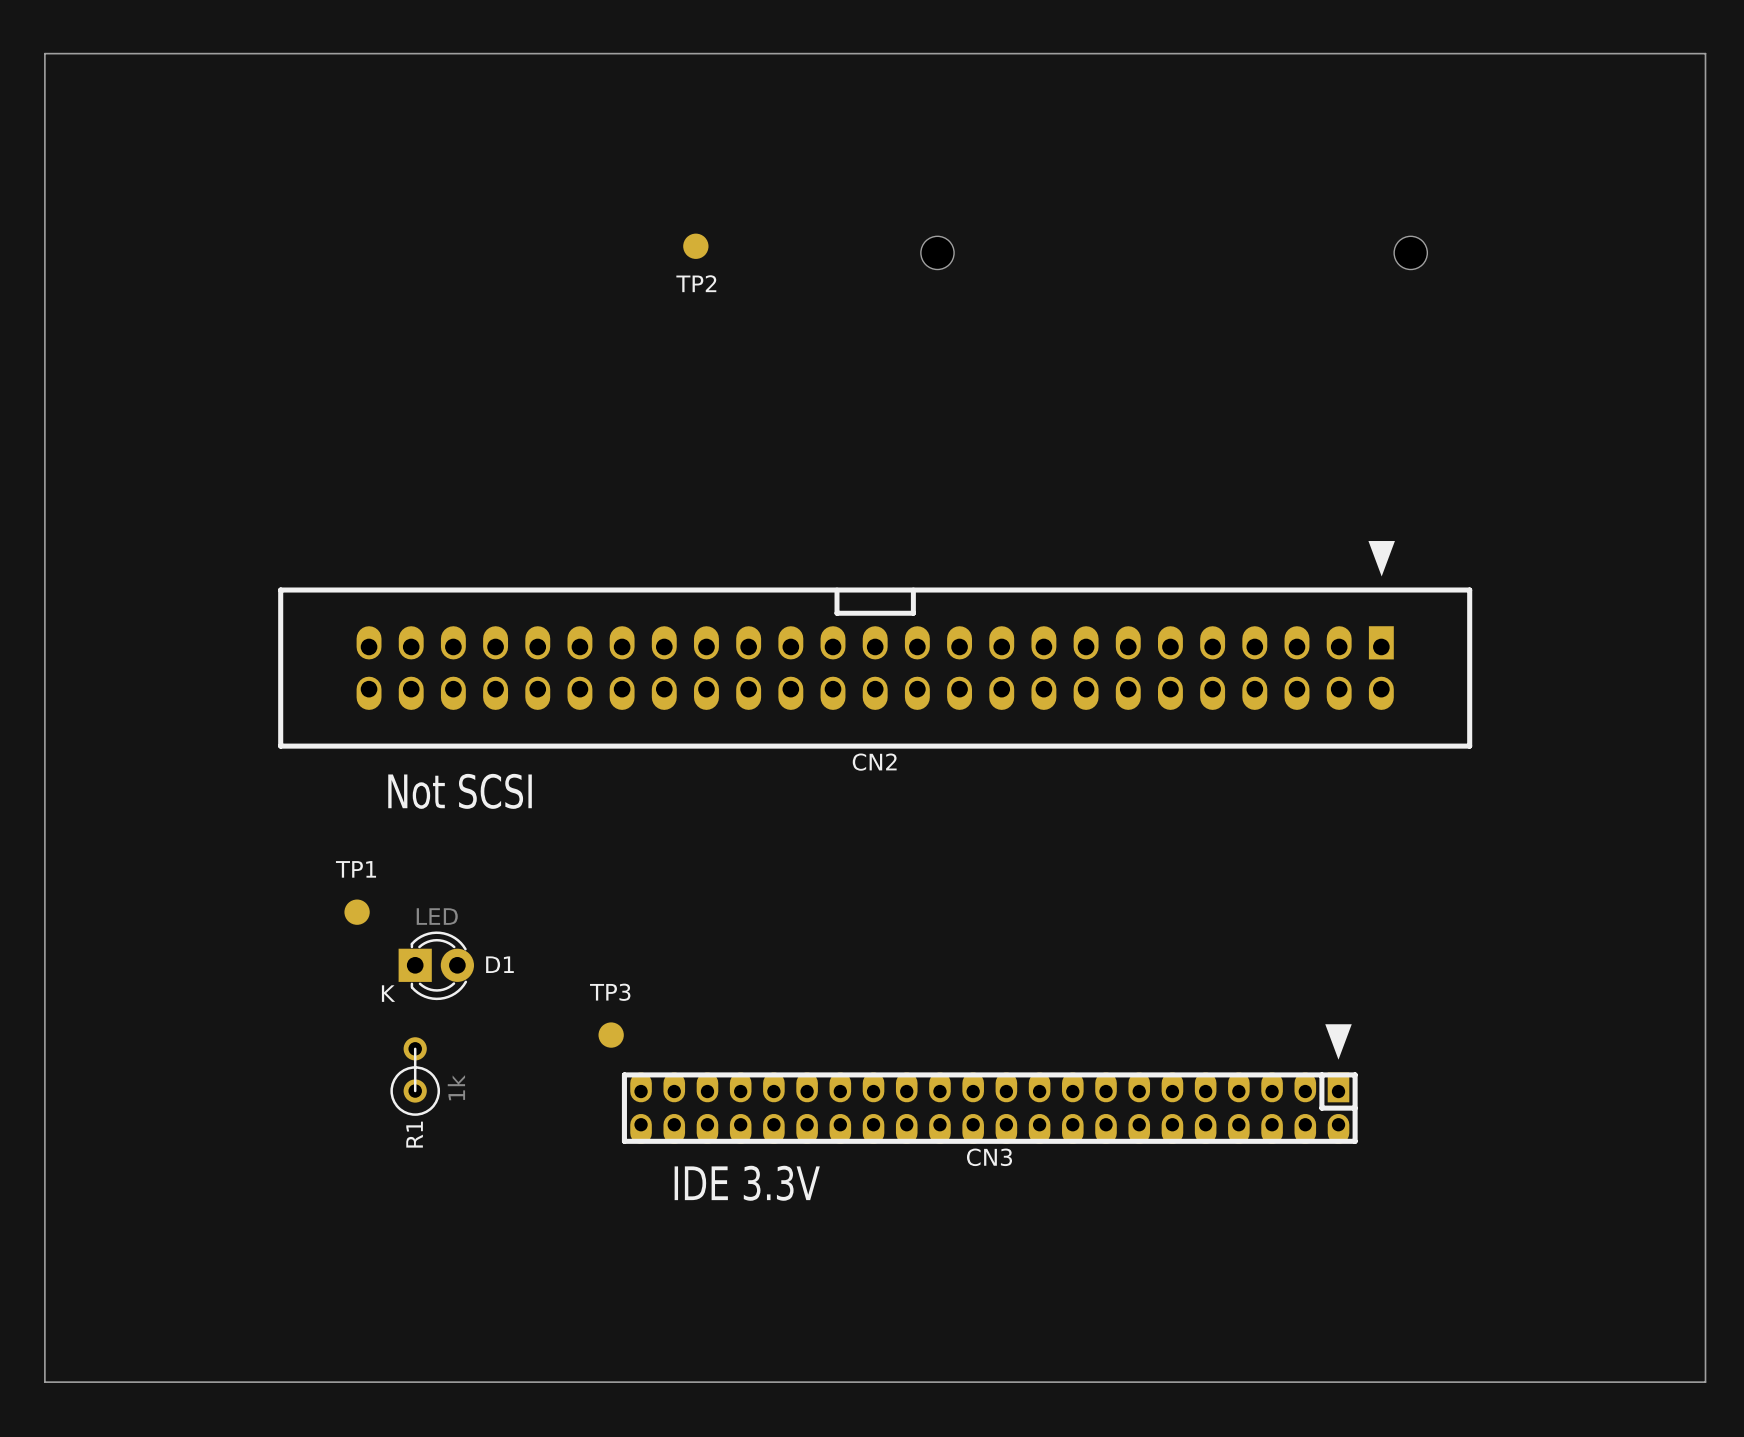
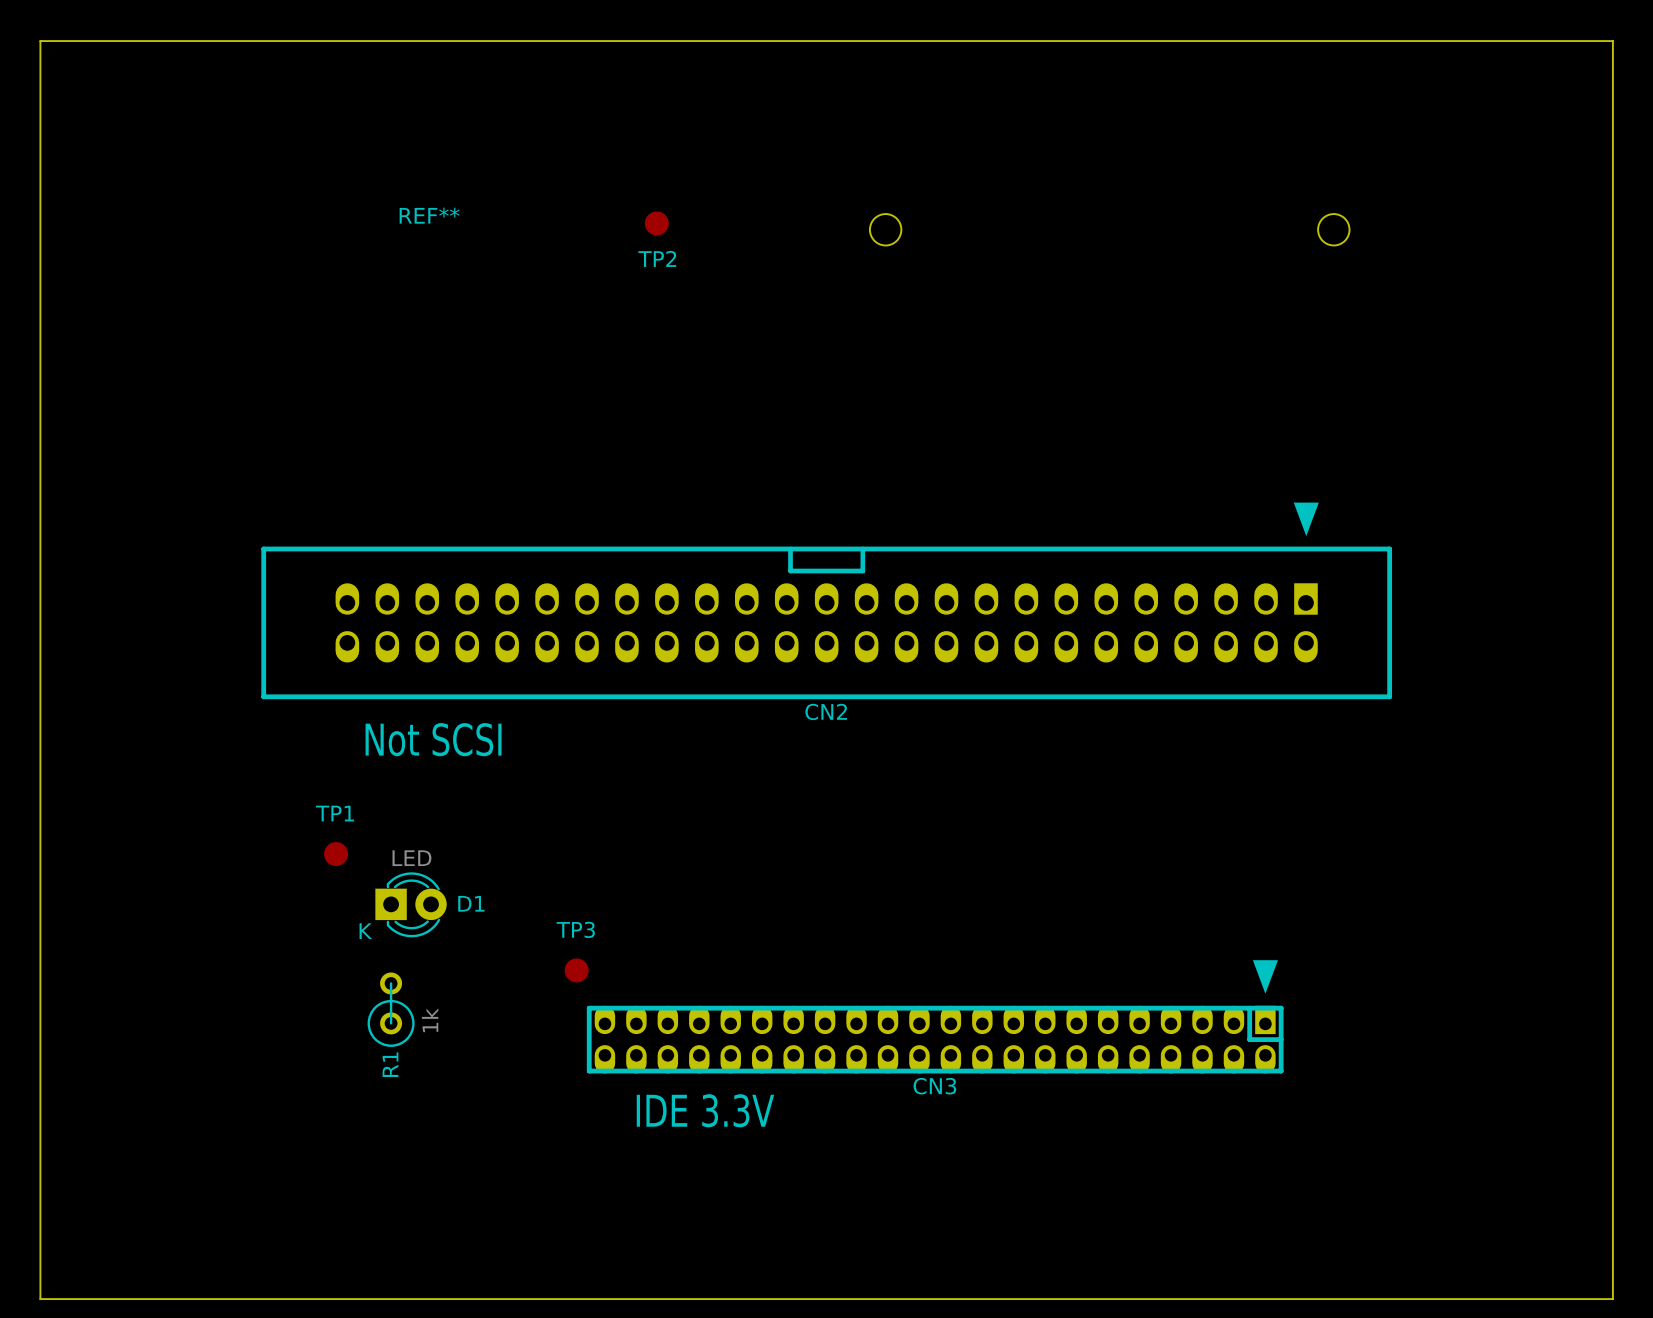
REF**: none -> (429, 215)

